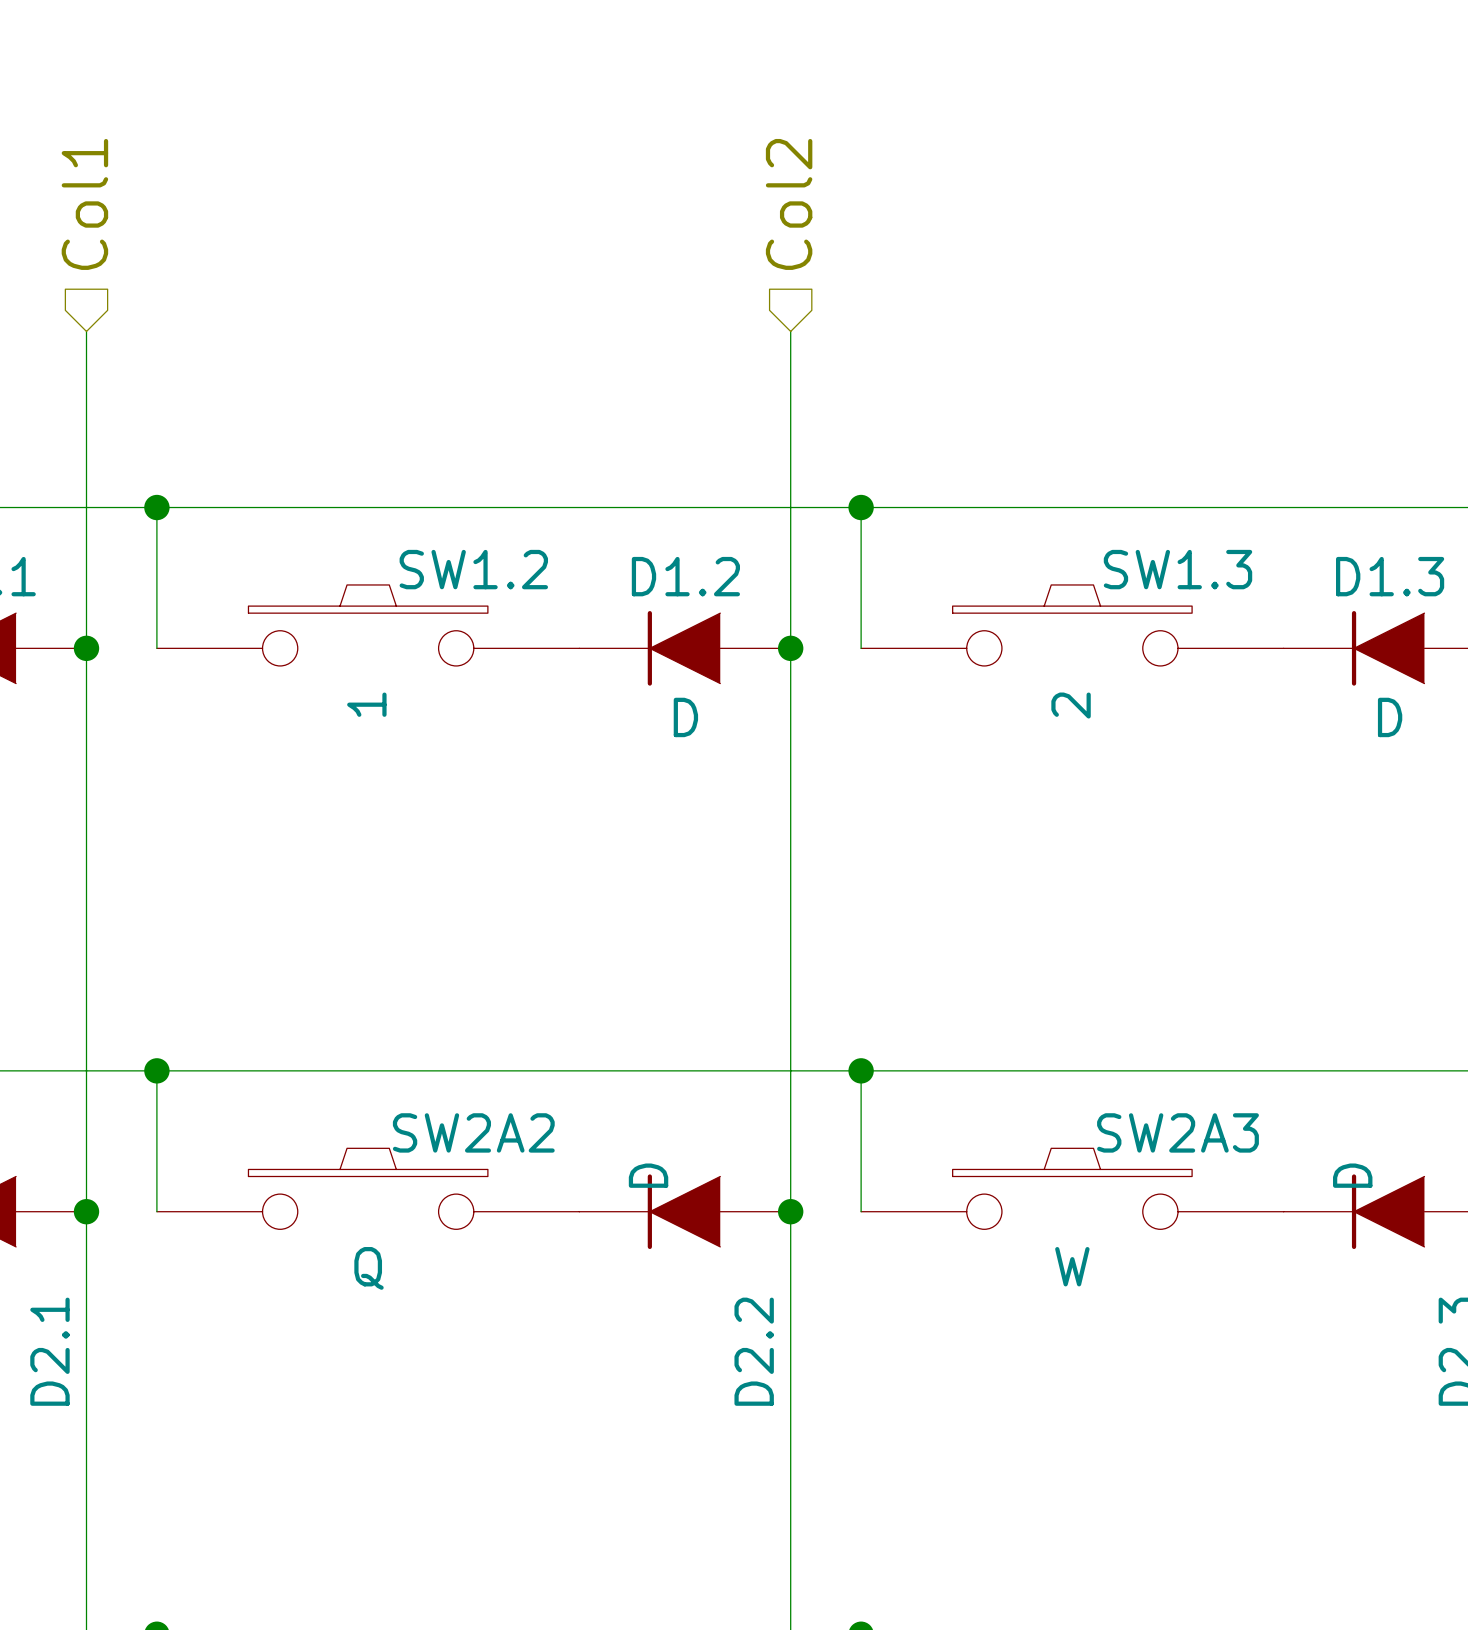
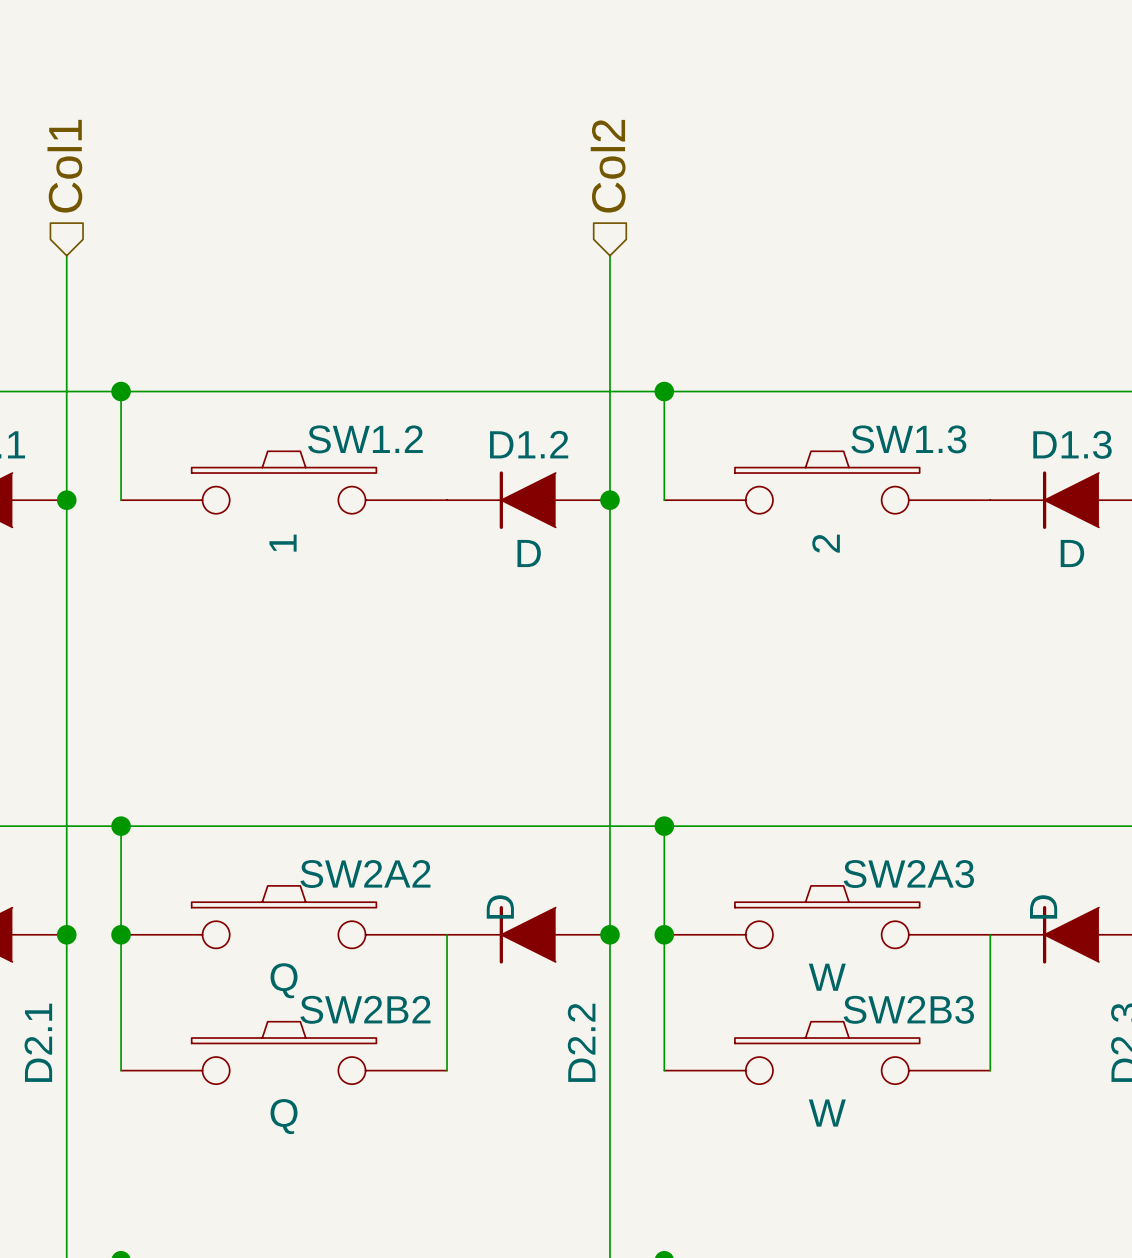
wire: none -> (121, 934) (121, 1070)
junction: none -> (121, 934)
wire: none -> (447, 934) (447, 1070)
wire: none -> (664, 934) (664, 1070)
junction: none -> (664, 934)
wire: none -> (990, 934) (990, 1070)
SW2B2: none -> Q (284, 1052)
SW2B3: none -> W (827, 1052)

